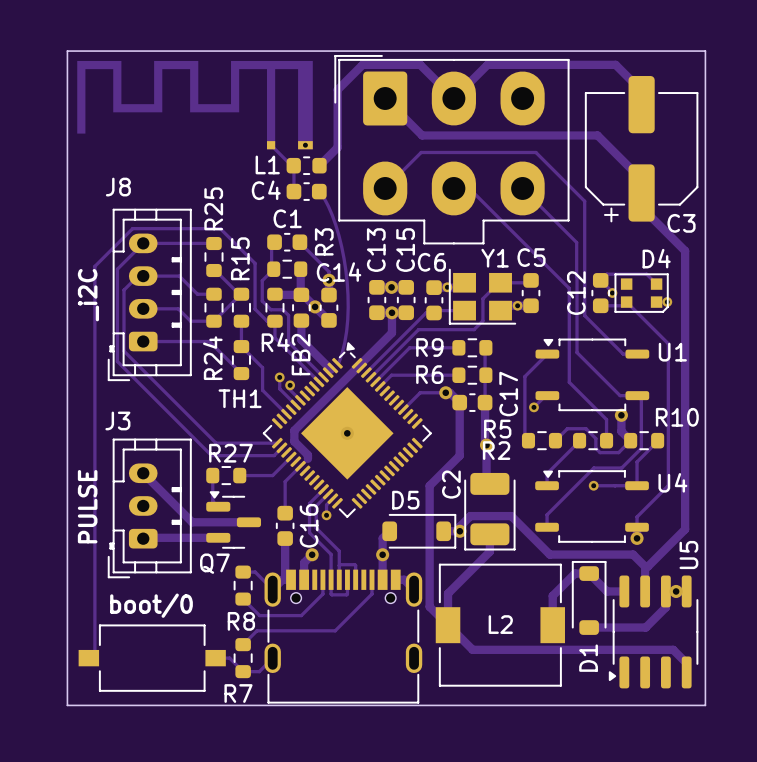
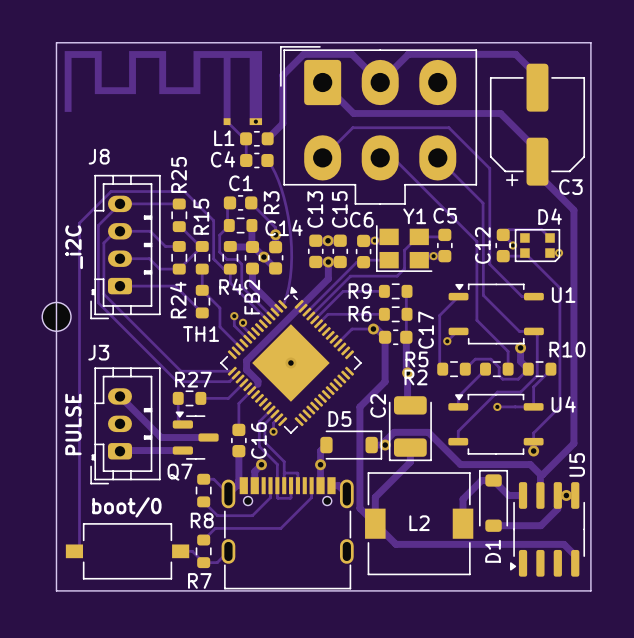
part: none -> (56, 316)

